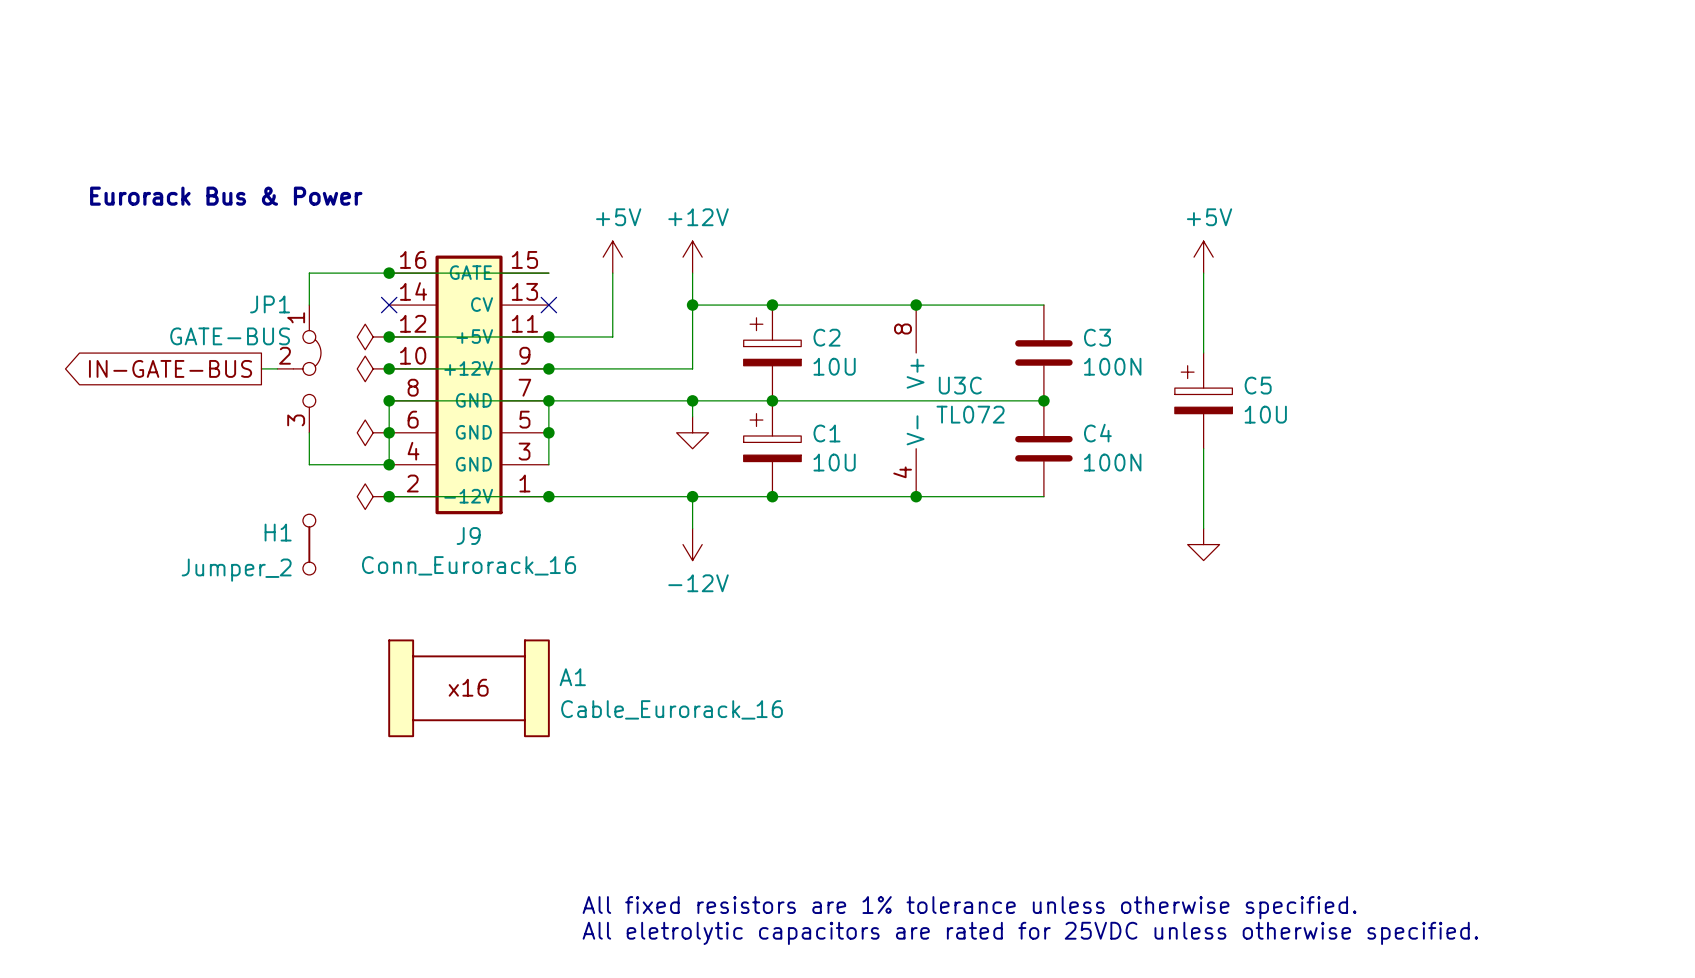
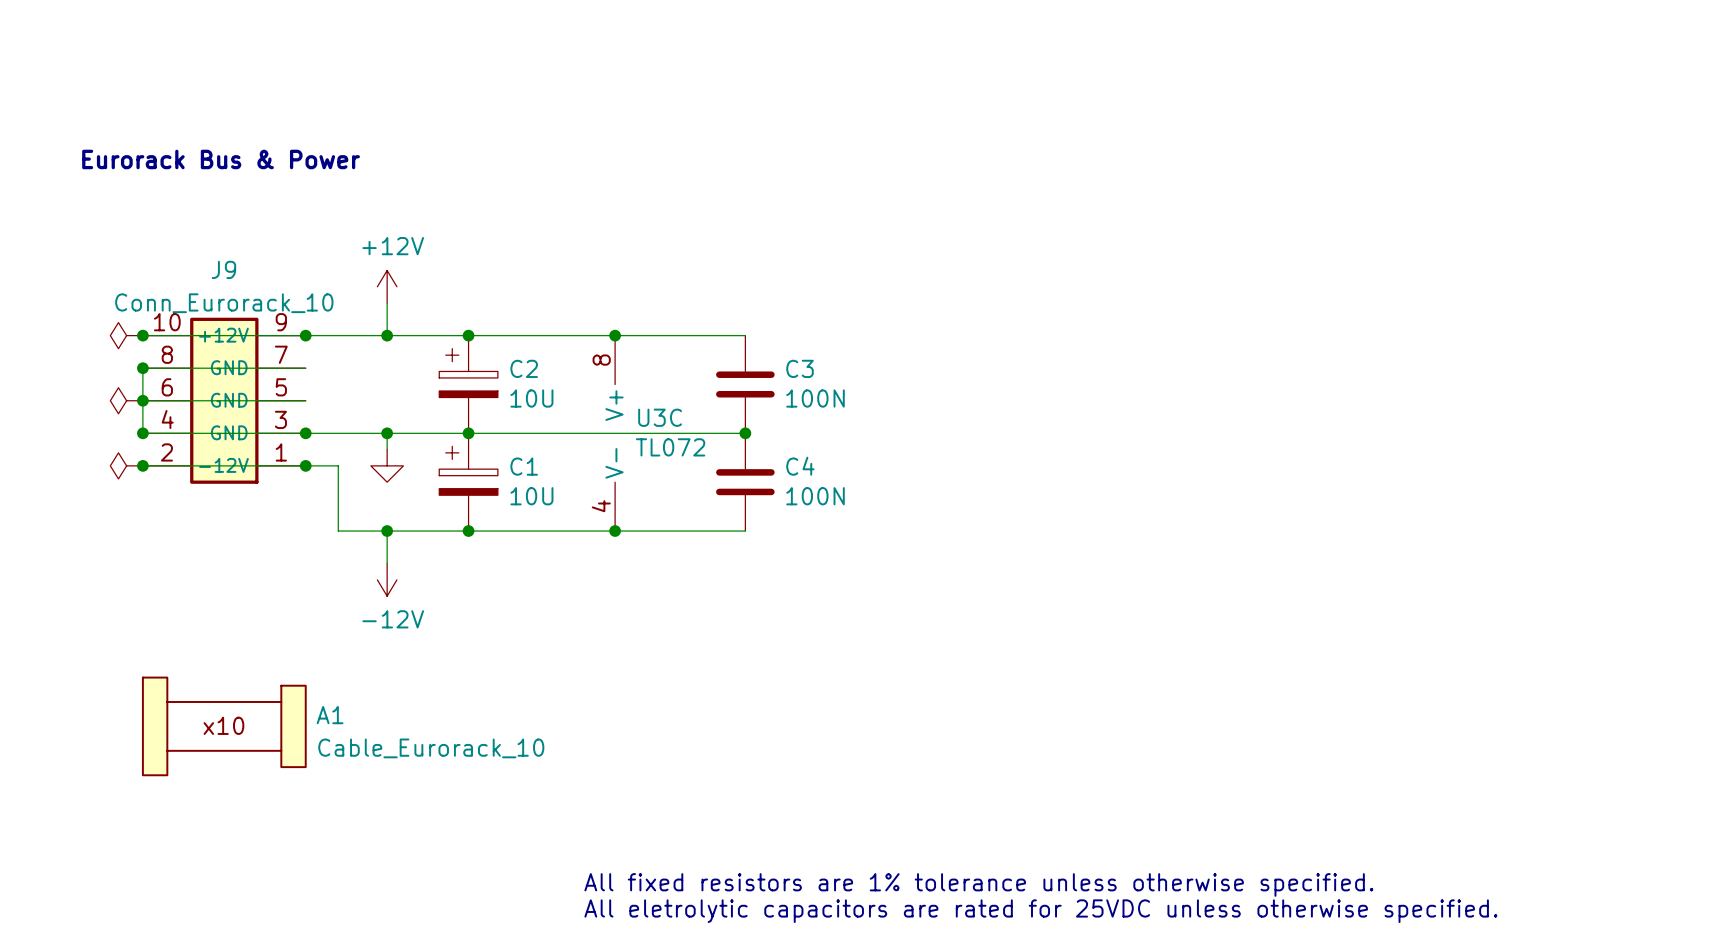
J9 symbol: [389, 255, 549, 515] -> [142, 317, 306, 484]
power symbol: +5V (612, 257) -> none
power symbol position: +12V (692, 257) -> +12V (387, 286)
power symbol: +5V (1203, 257) -> none
junction: (389, 273) -> none
wire: (548, 273) (309, 273) (309, 305) -> none
wire: (612, 273) (612, 336) (389, 336) -> (273, 335) (387, 335) (387, 303)
wire: (692, 273) (692, 368) -> (745, 335) (696, 335)
wire: (1203, 273) (1203, 352) -> none
no-connect mark: (389, 305) -> none
no-connect mark: (548, 305) -> none
wire: (692, 305) (1043, 305) -> none
junction: (692, 305) -> none
junction: (772, 305) -> none
junction: (916, 305) -> none
power symbol: (373, 336) -> none
junction: (389, 336) -> none
junction: (548, 336) -> none
C2 position: (772, 352) -> (468, 384)
C3 position: (1043, 352) -> (745, 384)
power symbol: none -> (126, 335)
wire: none -> (142, 335) (256, 335)
junction: none -> (142, 335)
global label: IN-GATE-BUS (170, 368) -> none
JP1: GATE-BUS (299, 368) -> none
junction: none -> (305, 335)
power symbol: (373, 368) -> none
junction: none -> (468, 335)
junction: (548, 368) -> none
junction: none -> (615, 335)
junction: none -> (142, 368)
junction: (389, 400) -> none
wire: (548, 400) (548, 464) -> none
junction: (548, 400) -> none
wire: (692, 400) (692, 416) -> none
junction: (692, 400) -> none
junction: (772, 400) -> none
U3C position: (916, 400) -> (615, 433)
wire: (1043, 400) (389, 400) (389, 464) -> none
junction: (1043, 400) -> none
C5: 10U (1203, 400) -> none
power symbol: none -> (126, 400)
wire: none -> (142, 400) (305, 400)
junction: none -> (142, 400)
wire: (309, 432) (309, 464) -> (305, 368) (142, 368) (142, 433) (305, 433)
power symbol: (373, 432) -> none
junction: (389, 432) -> none
junction: (548, 432) -> none
power symbol position: (692, 432) -> (387, 465)
C1 position: (772, 448) -> (468, 482)
C4 position: (1043, 448) -> (745, 482)
wire: (1203, 448) (1203, 528) -> none
junction: none -> (142, 433)
junction: none -> (305, 433)
junction: none -> (468, 433)
wire: none -> (745, 433) (387, 433) (387, 449)
junction: none -> (745, 433)
power symbol: none -> (126, 465)
wire: none -> (142, 465) (338, 465) (338, 531) (745, 531)
junction: none -> (142, 465)
junction: none -> (305, 465)
power symbol: (373, 496) -> none
wire: (389, 496) (1043, 496) -> none
junction: (389, 496) -> none
junction: (548, 496) -> none
wire: (692, 496) (692, 528) -> (387, 531) (387, 563)
junction: (692, 496) -> none
junction: (772, 496) -> none
junction: (916, 496) -> none
J9 name position: J9 (468, 536) -> J9 (223, 269)
H1: Jumper_2 (309, 544) -> none
power symbol position: -12V (692, 544) -> -12V (387, 579)
power symbol: (1203, 544) -> none
junction: none -> (387, 531)
junction: none -> (468, 531)
junction: none -> (615, 531)
J9 value: Conn_Eurorack_16 (469, 565) -> Conn_Eurorack_10 (224, 303)
A1 symbol: [388, 639, 550, 738] -> [141, 676, 307, 777]
A1 value: Cable_Eurorack_16 (672, 709) -> Cable_Eurorack_10 (431, 748)

